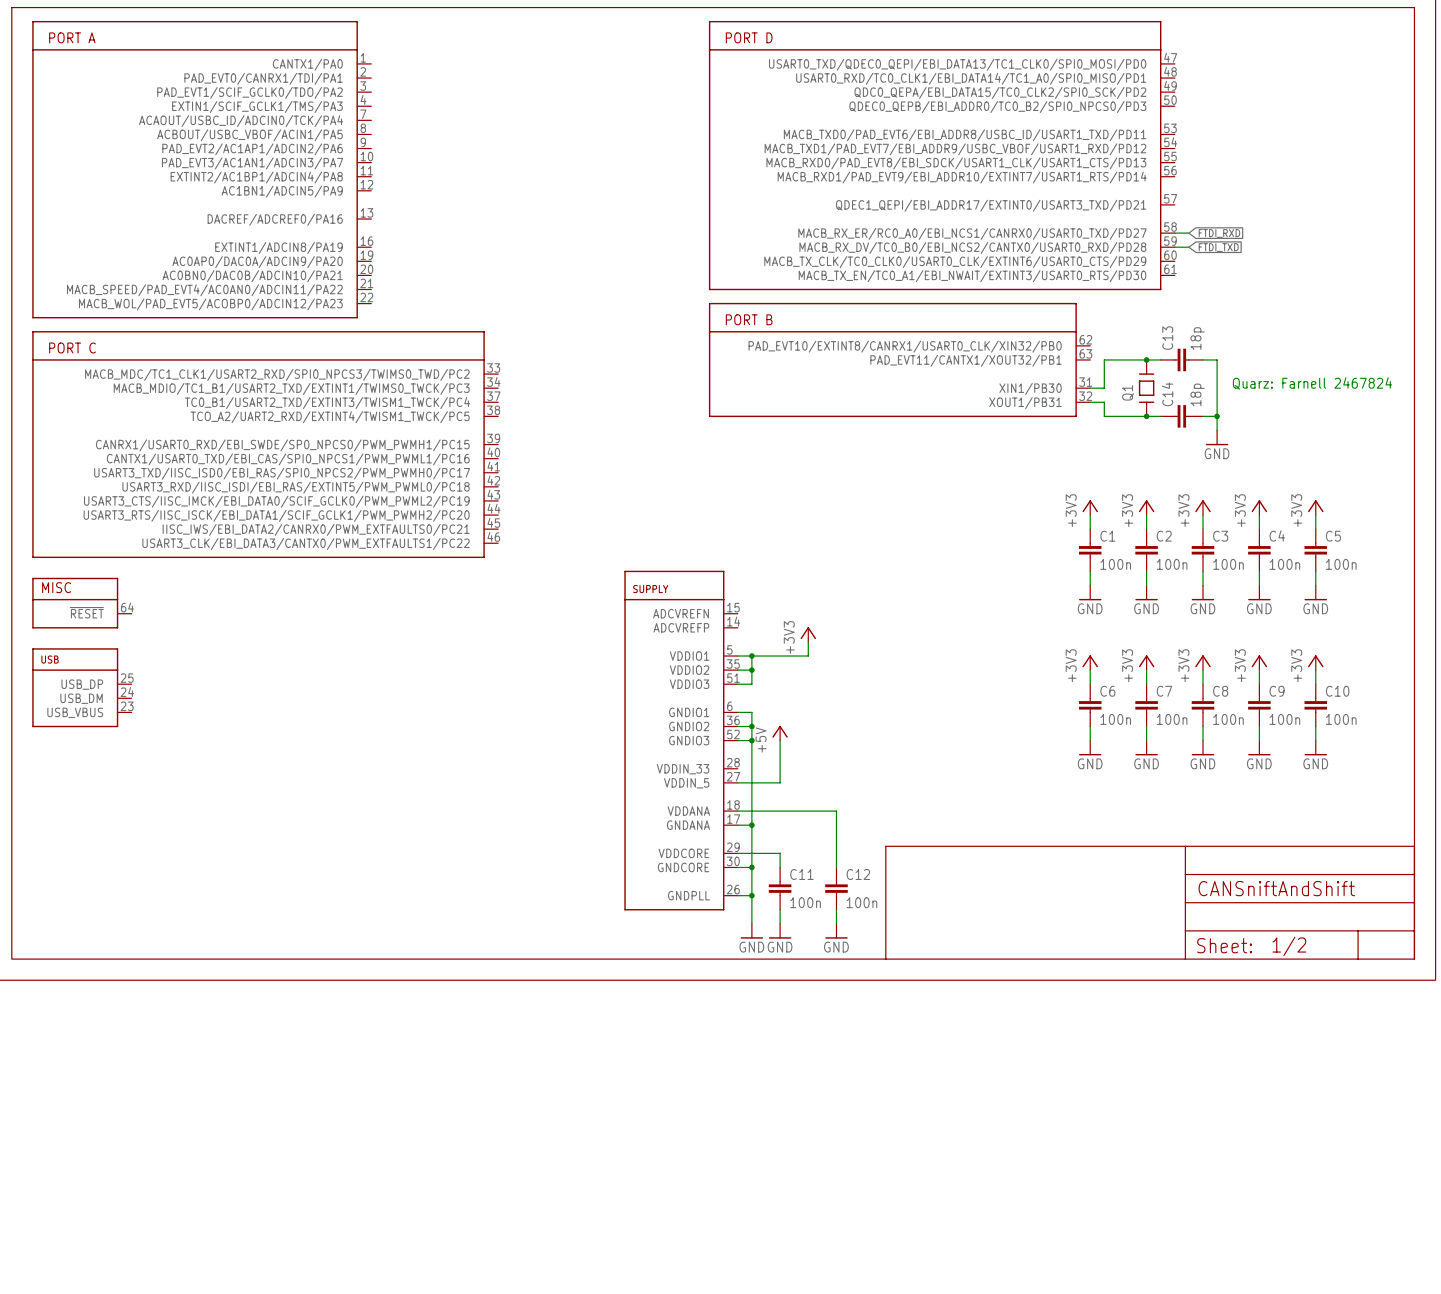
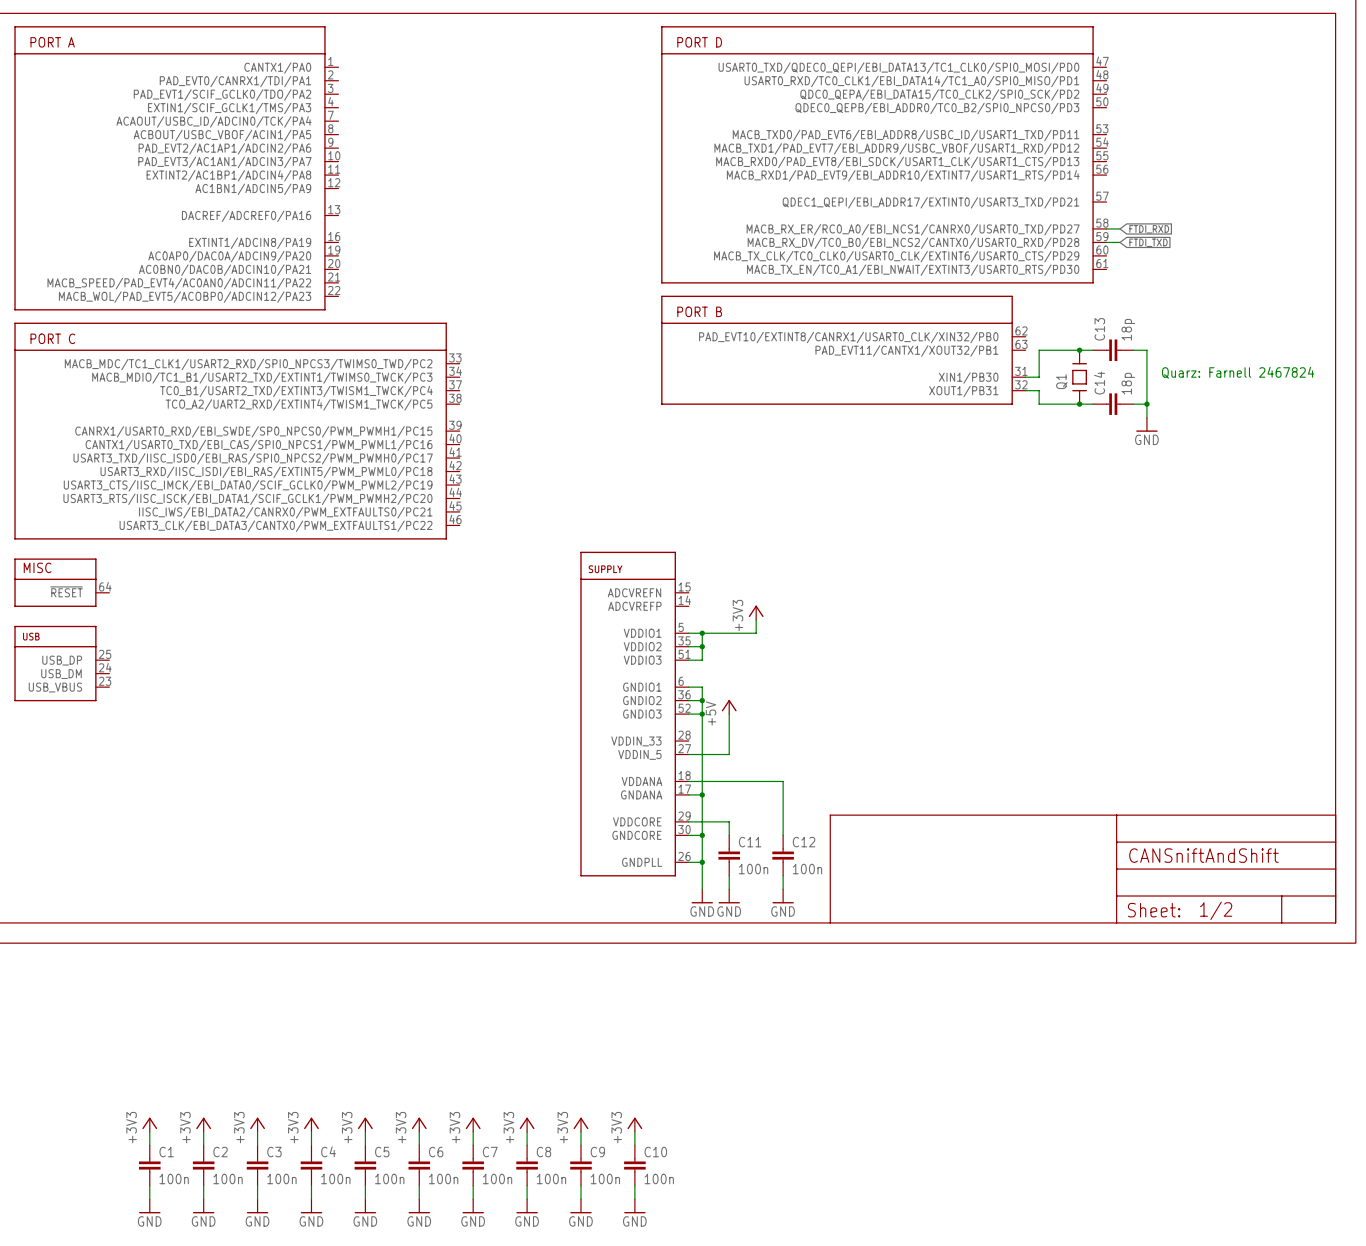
power symbol: +3V3 (1090, 507) -> none
power symbol: +3V3 (1146, 507) -> none
power symbol: +3V3 (1203, 507) -> none
power symbol: +3V3 (1259, 507) -> none
power symbol: +3V3 (1315, 507) -> none
wire: (1090, 515) (1090, 529) -> none
wire: (1146, 515) (1146, 529) -> none
wire: (1203, 515) (1203, 529) -> none
wire: (1259, 515) (1259, 529) -> none
wire: (1315, 515) (1315, 529) -> none
C1 position: (1090, 550) -> (149, 1165)
C2 position: (1146, 550) -> (203, 1165)
C3 position: (1203, 550) -> (257, 1165)
C4 position: (1259, 550) -> (311, 1165)
C5 position: (1315, 550) -> (365, 1165)
wire: (1090, 571) (1090, 585) -> none
wire: (1146, 571) (1146, 585) -> none
wire: (1203, 571) (1203, 585) -> none
wire: (1259, 571) (1259, 585) -> none
wire: (1315, 571) (1315, 585) -> none
power symbol: GND (1090, 592) -> none
power symbol: GND (1146, 592) -> none
power symbol: GND (1203, 592) -> none
power symbol: GND (1259, 592) -> none
power symbol: GND (1315, 592) -> none
power symbol: +3V3 (1090, 662) -> none
power symbol: +3V3 (1146, 662) -> none
power symbol: +3V3 (1203, 662) -> none
power symbol: +3V3 (1259, 662) -> none
power symbol: +3V3 (1315, 662) -> none
wire: (1090, 670) (1090, 684) -> none
wire: (1146, 670) (1146, 684) -> none
wire: (1203, 670) (1203, 684) -> none
wire: (1259, 670) (1259, 684) -> none
wire: (1315, 670) (1315, 684) -> none
C6 position: (1090, 705) -> (419, 1165)
C7 position: (1146, 705) -> (473, 1165)
C8 position: (1203, 705) -> (527, 1165)
C9 position: (1259, 705) -> (580, 1165)
C10 position: (1315, 705) -> (634, 1165)
wire: (1090, 726) (1090, 740) -> none
wire: (1146, 726) (1146, 740) -> none
wire: (1203, 726) (1203, 740) -> none
wire: (1259, 726) (1259, 740) -> none
wire: (1315, 726) (1315, 740) -> none
power symbol: GND (1090, 747) -> none
power symbol: GND (1146, 747) -> none
power symbol: GND (1203, 747) -> none
power symbol: GND (1259, 747) -> none
power symbol: GND (1315, 747) -> none
power symbol: none -> +3V3 (149, 1124)
power symbol: none -> +3V3 (203, 1124)
power symbol: none -> +3V3 (257, 1124)
power symbol: none -> +3V3 (311, 1124)
power symbol: none -> +3V3 (365, 1124)
power symbol: none -> +3V3 (419, 1124)
power symbol: none -> +3V3 (473, 1124)
power symbol: none -> +3V3 (527, 1124)
power symbol: none -> +3V3 (580, 1124)
power symbol: none -> +3V3 (634, 1124)
wire: none -> (149, 1131) (149, 1145)
wire: none -> (203, 1131) (203, 1145)
wire: none -> (257, 1131) (257, 1145)
wire: none -> (311, 1131) (311, 1145)
wire: none -> (365, 1131) (365, 1145)
wire: none -> (419, 1131) (419, 1145)
wire: none -> (473, 1131) (473, 1145)
wire: none -> (527, 1131) (527, 1145)
wire: none -> (580, 1131) (580, 1145)
wire: none -> (634, 1131) (634, 1145)
wire: none -> (149, 1185) (149, 1199)
wire: none -> (203, 1185) (203, 1199)
wire: none -> (257, 1185) (257, 1199)
wire: none -> (311, 1185) (311, 1199)
wire: none -> (365, 1185) (365, 1199)
wire: none -> (419, 1185) (419, 1199)
wire: none -> (473, 1185) (473, 1199)
wire: none -> (527, 1185) (527, 1199)
wire: none -> (580, 1185) (580, 1199)
wire: none -> (634, 1185) (634, 1199)
power symbol: none -> GND (149, 1206)
power symbol: none -> GND (203, 1206)
power symbol: none -> GND (257, 1206)
power symbol: none -> GND (311, 1206)
power symbol: none -> GND (365, 1206)
power symbol: none -> GND (419, 1206)
power symbol: none -> GND (473, 1206)
power symbol: none -> GND (527, 1206)
power symbol: none -> GND (580, 1206)
power symbol: none -> GND (634, 1206)

